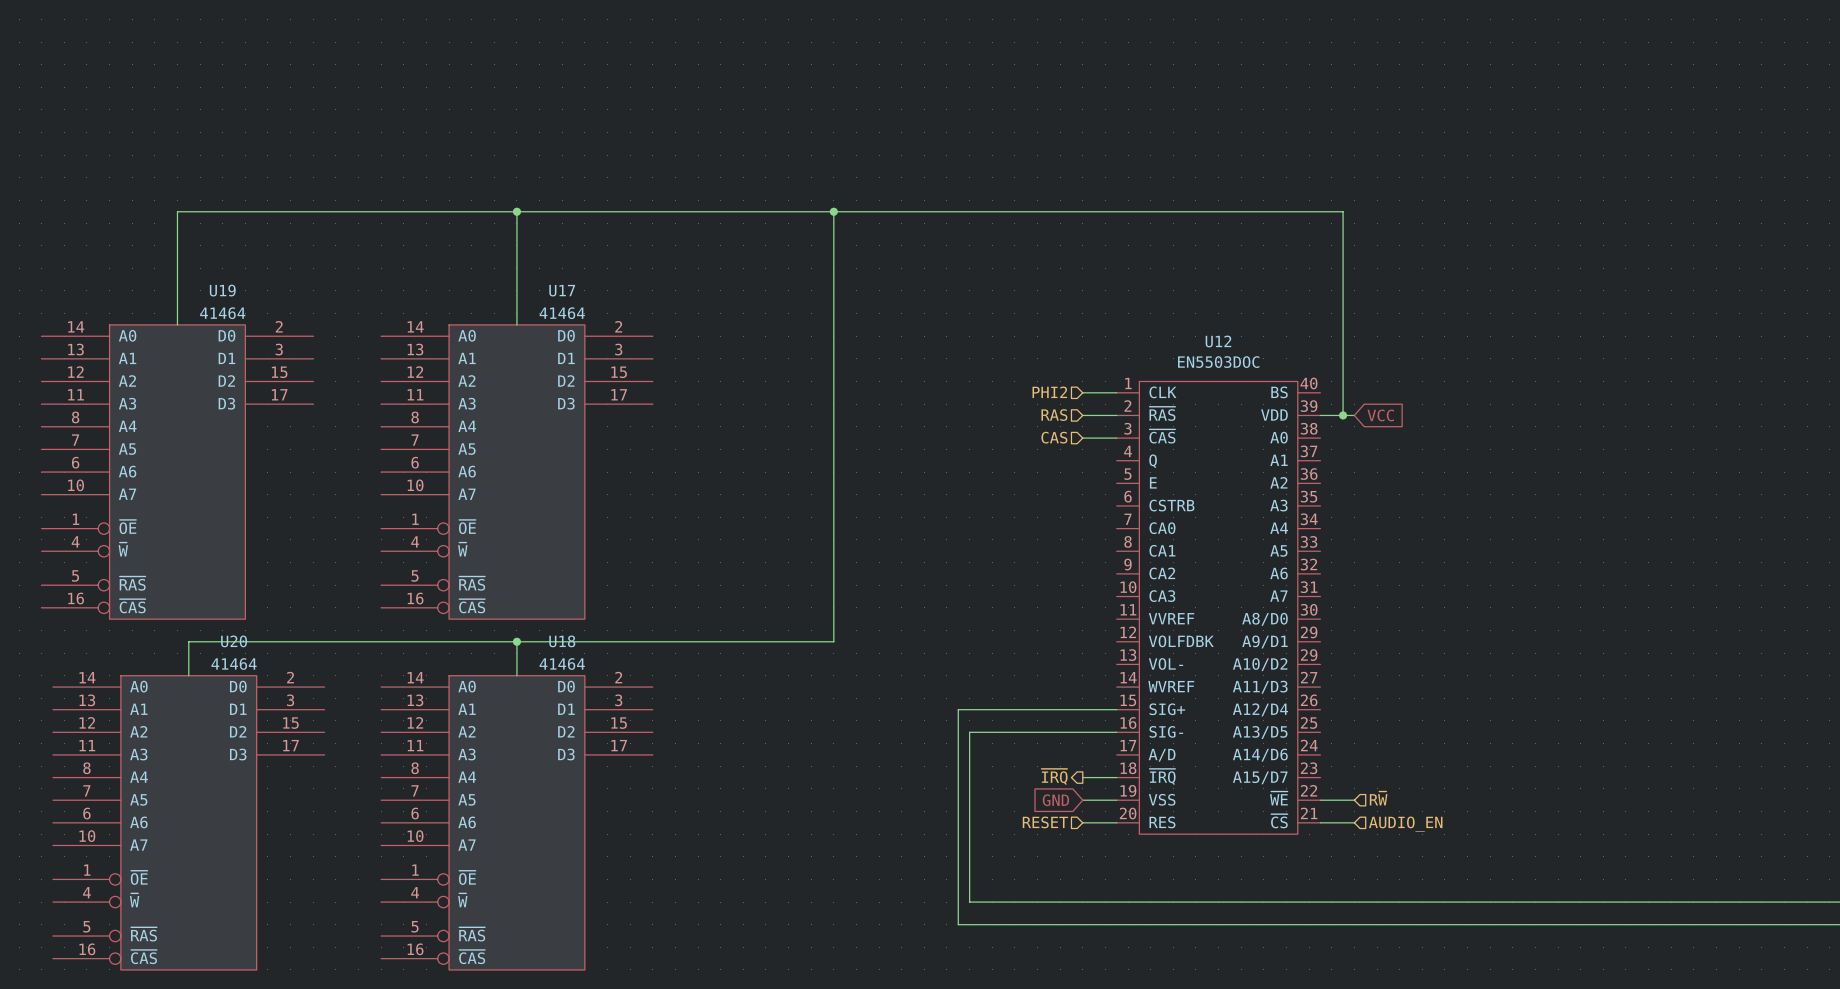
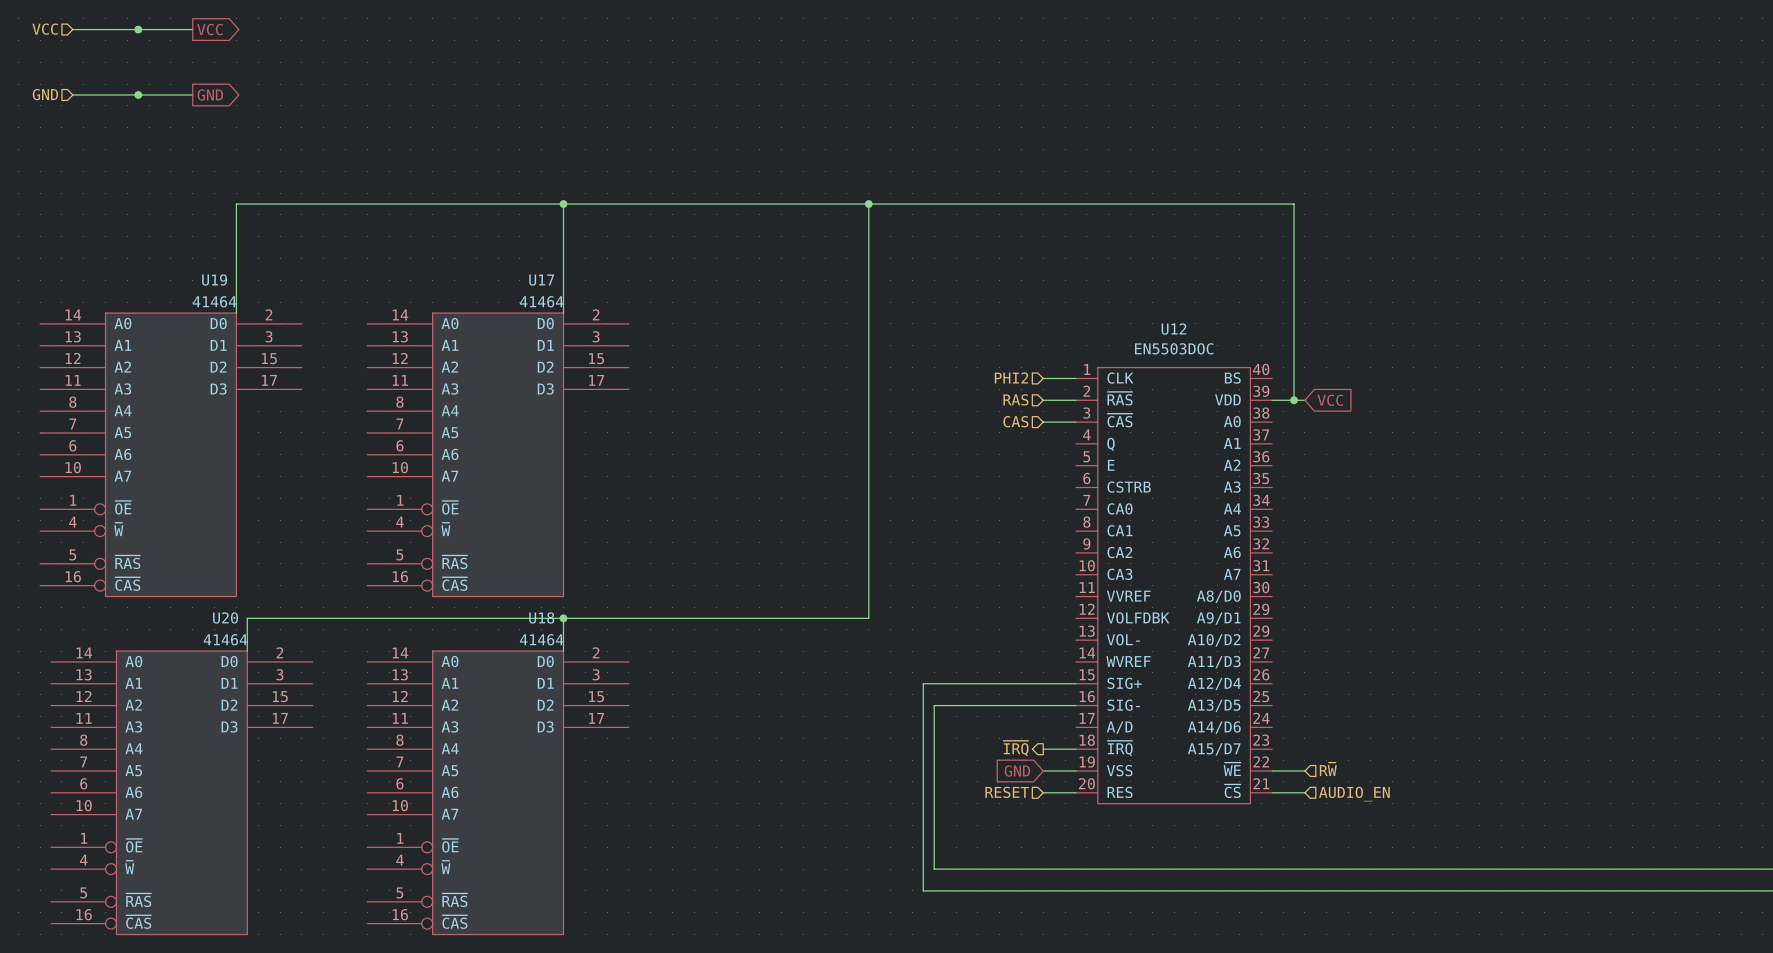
hierarchical label: none -> VCC (45, 29)
wire: none -> (72, 29) (192, 29)
junction: none -> (138, 29)
global label: none -> VCC (210, 29)
hierarchical label: none -> GND (45, 94)
wire: none -> (72, 94) (192, 94)
junction: none -> (138, 94)
global label: none -> GND (210, 95)
wire: (245, 211) (177, 211) (177, 324) -> (236, 204) (236, 313)
wire: (516, 211) (516, 324) -> (563, 204) (563, 313)
junction: (516, 211) -> none
junction: none -> (563, 204)
wire: (833, 211) (833, 641) -> (868, 204) (868, 618) (803, 618)
junction: (833, 211) -> none
junction: none -> (868, 204)
wire: (256, 641) (188, 641) (188, 675) -> (247, 618) (247, 651)
wire: (516, 641) (516, 675) -> (563, 618) (563, 651)
junction: (516, 641) -> none
junction: none -> (563, 618)

